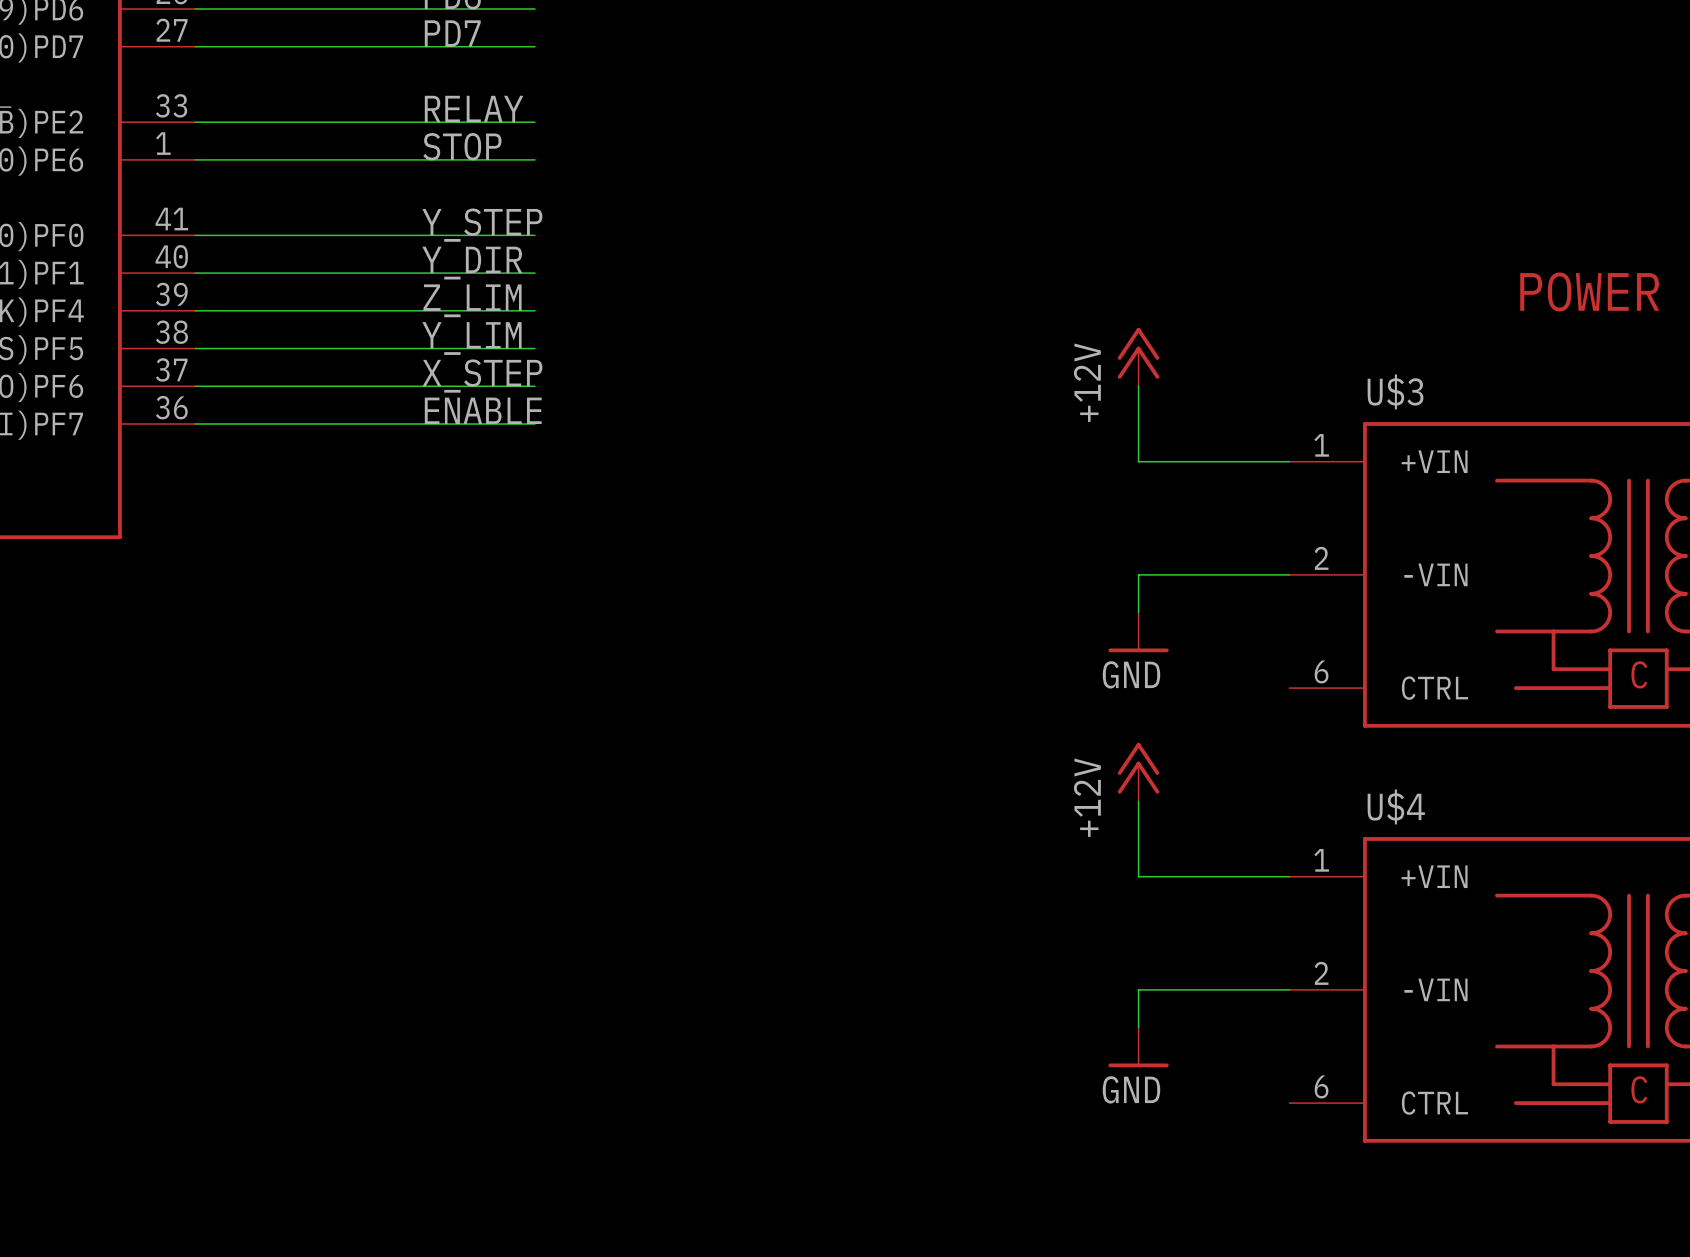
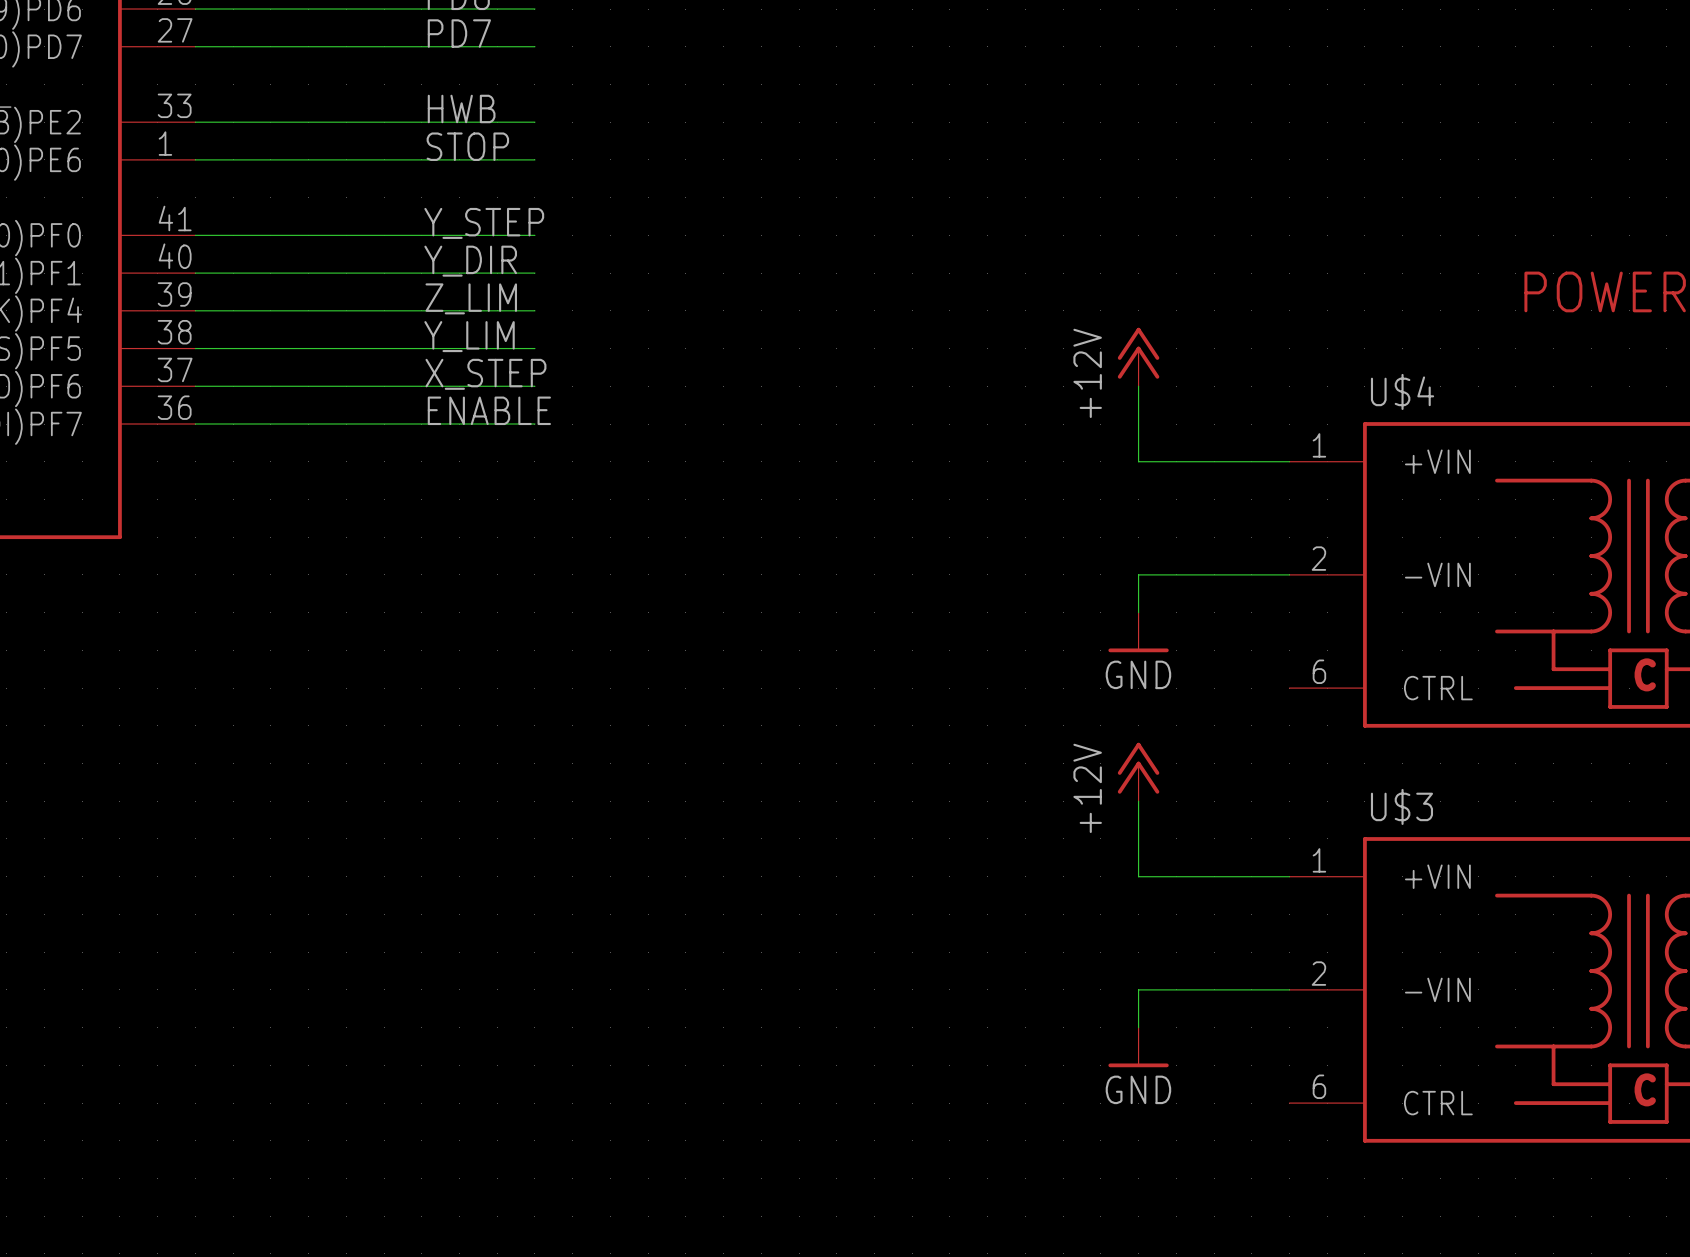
label: RELAY (474, 108) -> HWB (461, 108)
U$3 name: U$3 (1395, 391) -> U$4 (1402, 391)
U$4 name: U$4 (1396, 806) -> U$3 (1401, 806)

